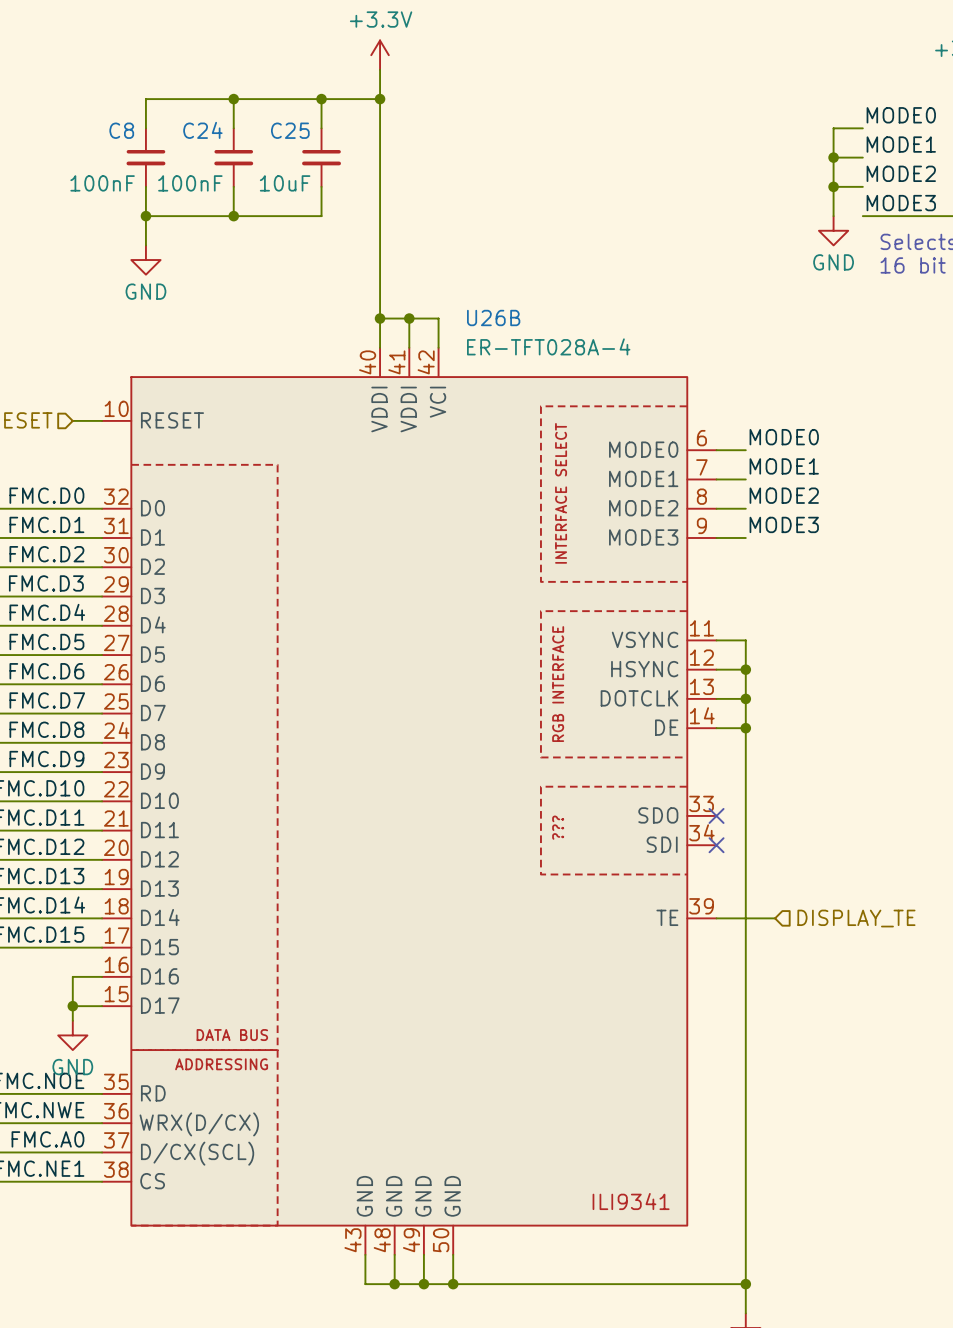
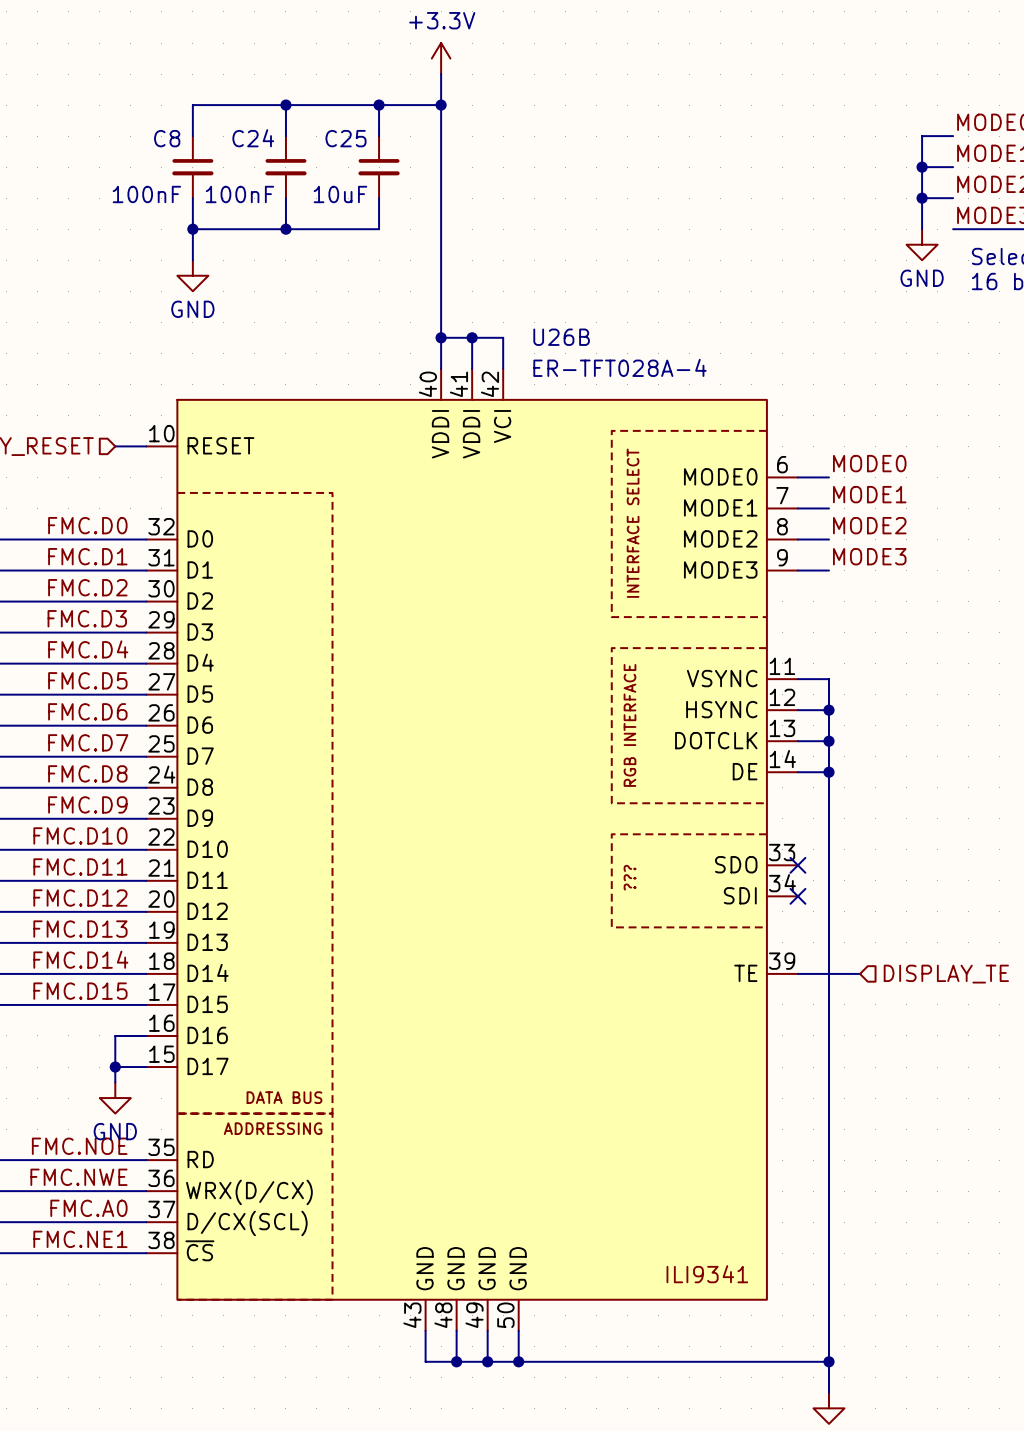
U26B pin name: CS (152, 1181) -> ~{CS} (199, 1250)

